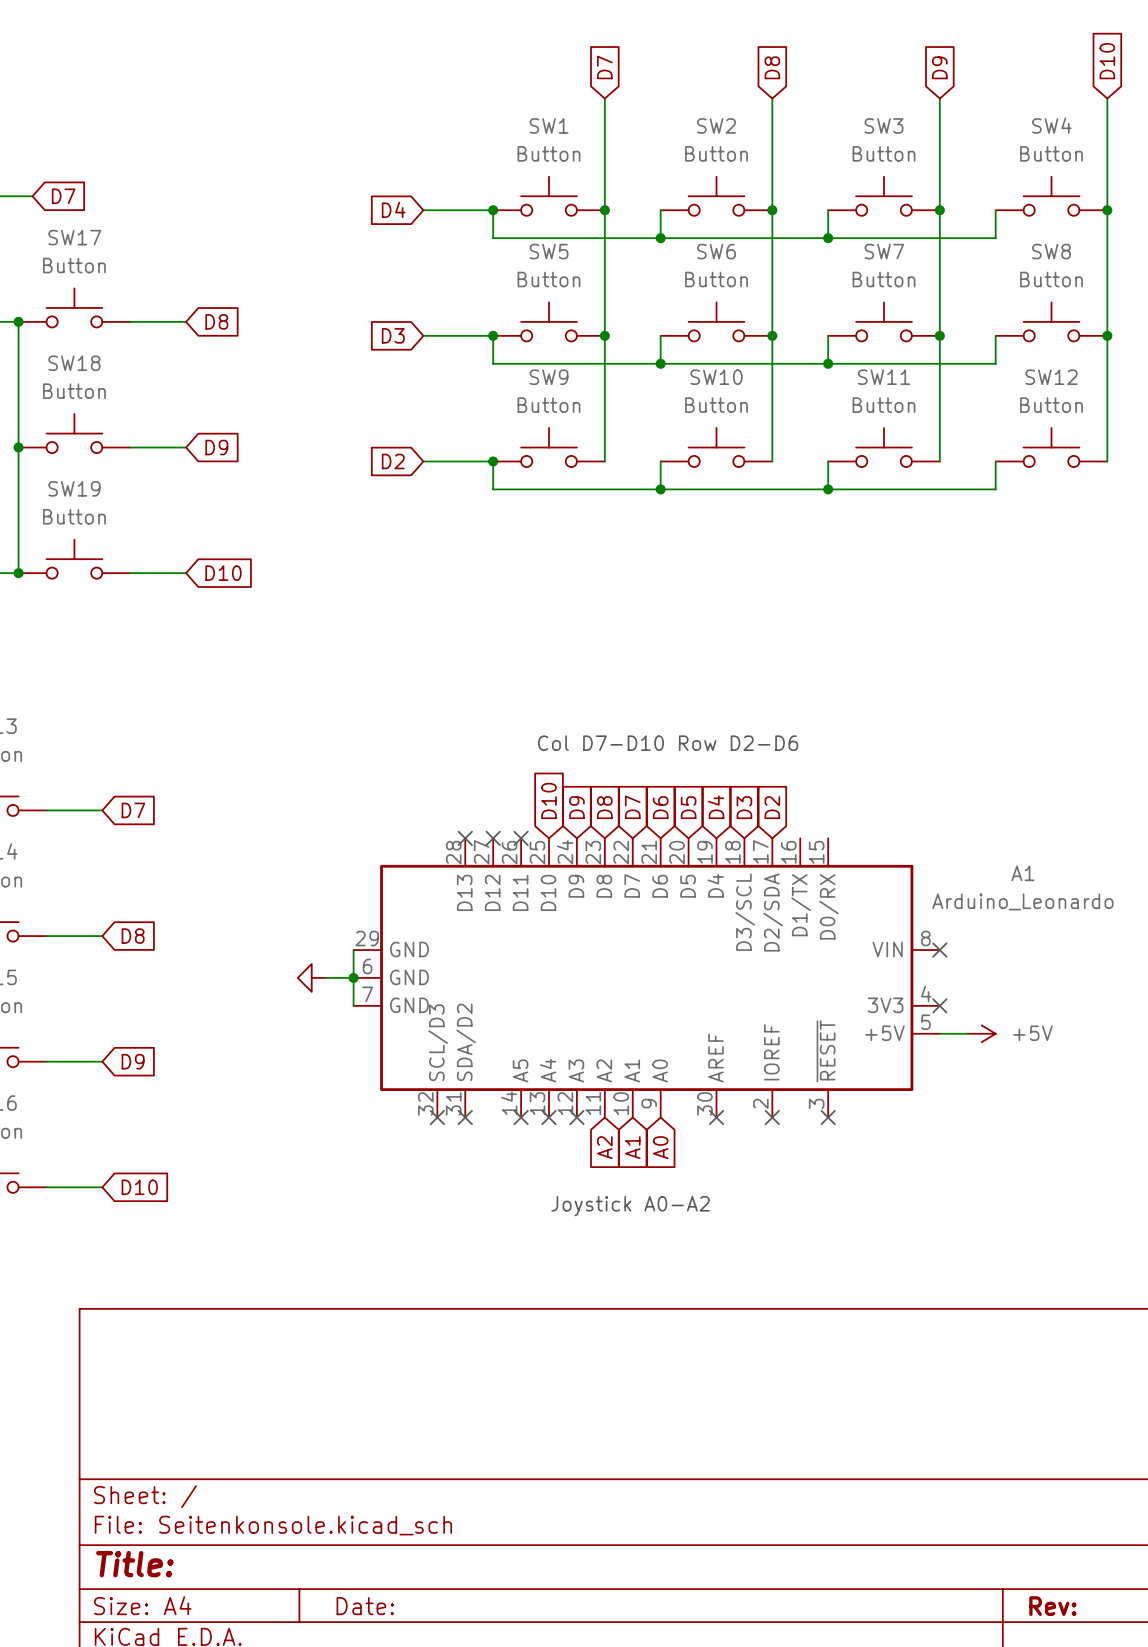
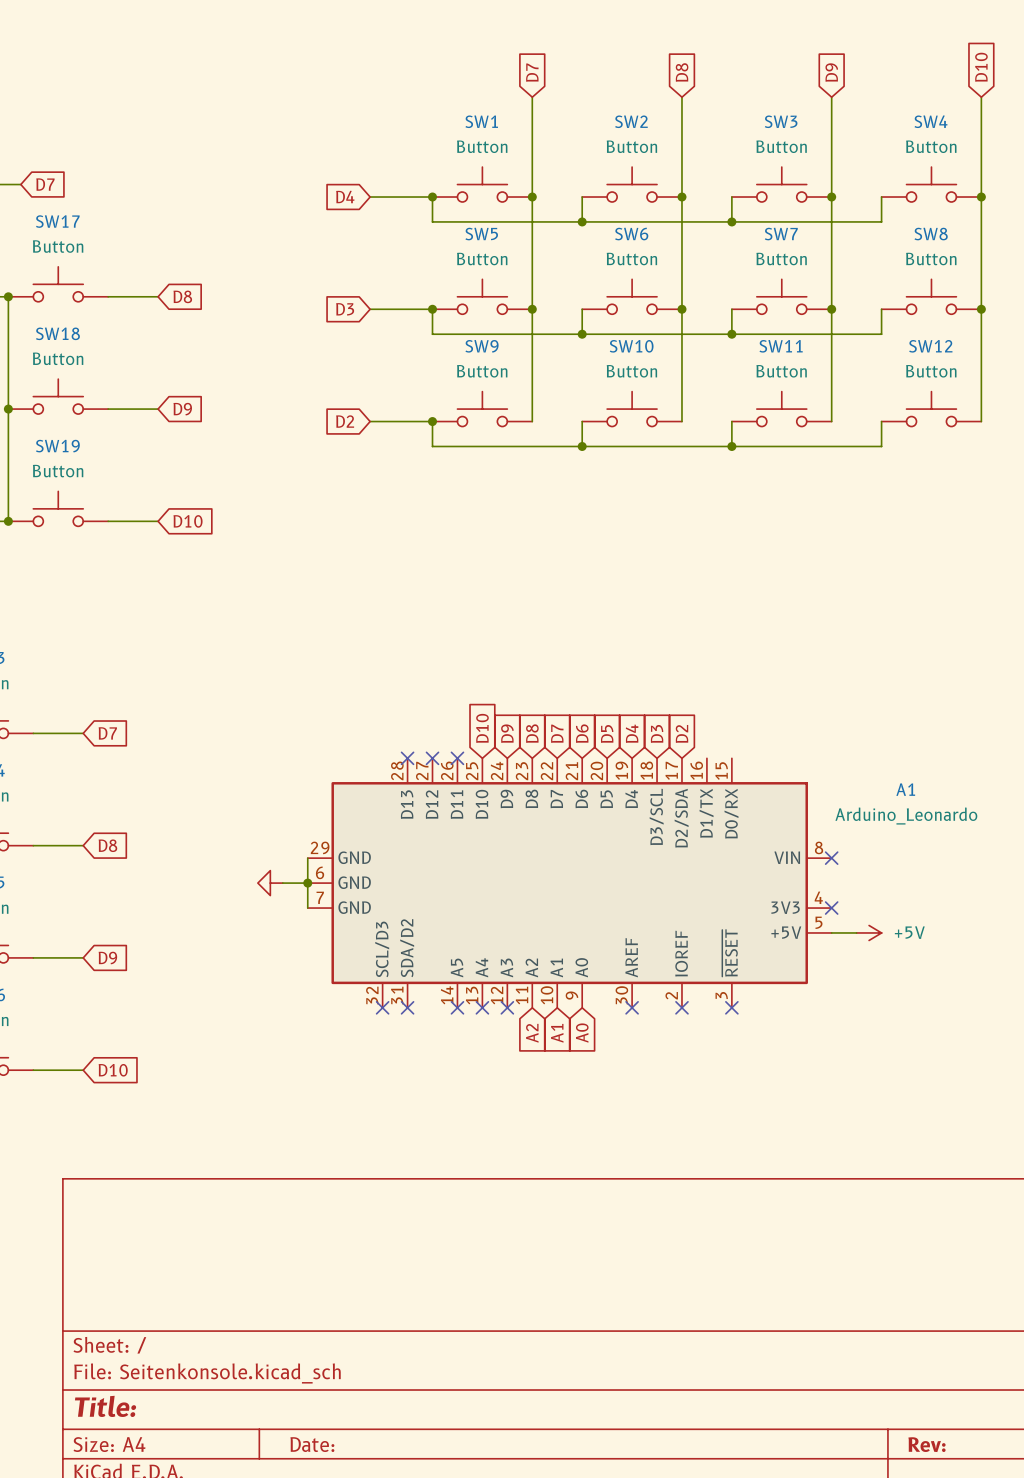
text: Col D7-D10 Row D2-D6 (668, 743) -> none
text: Joystick A0-A2 (630, 1206) -> none

